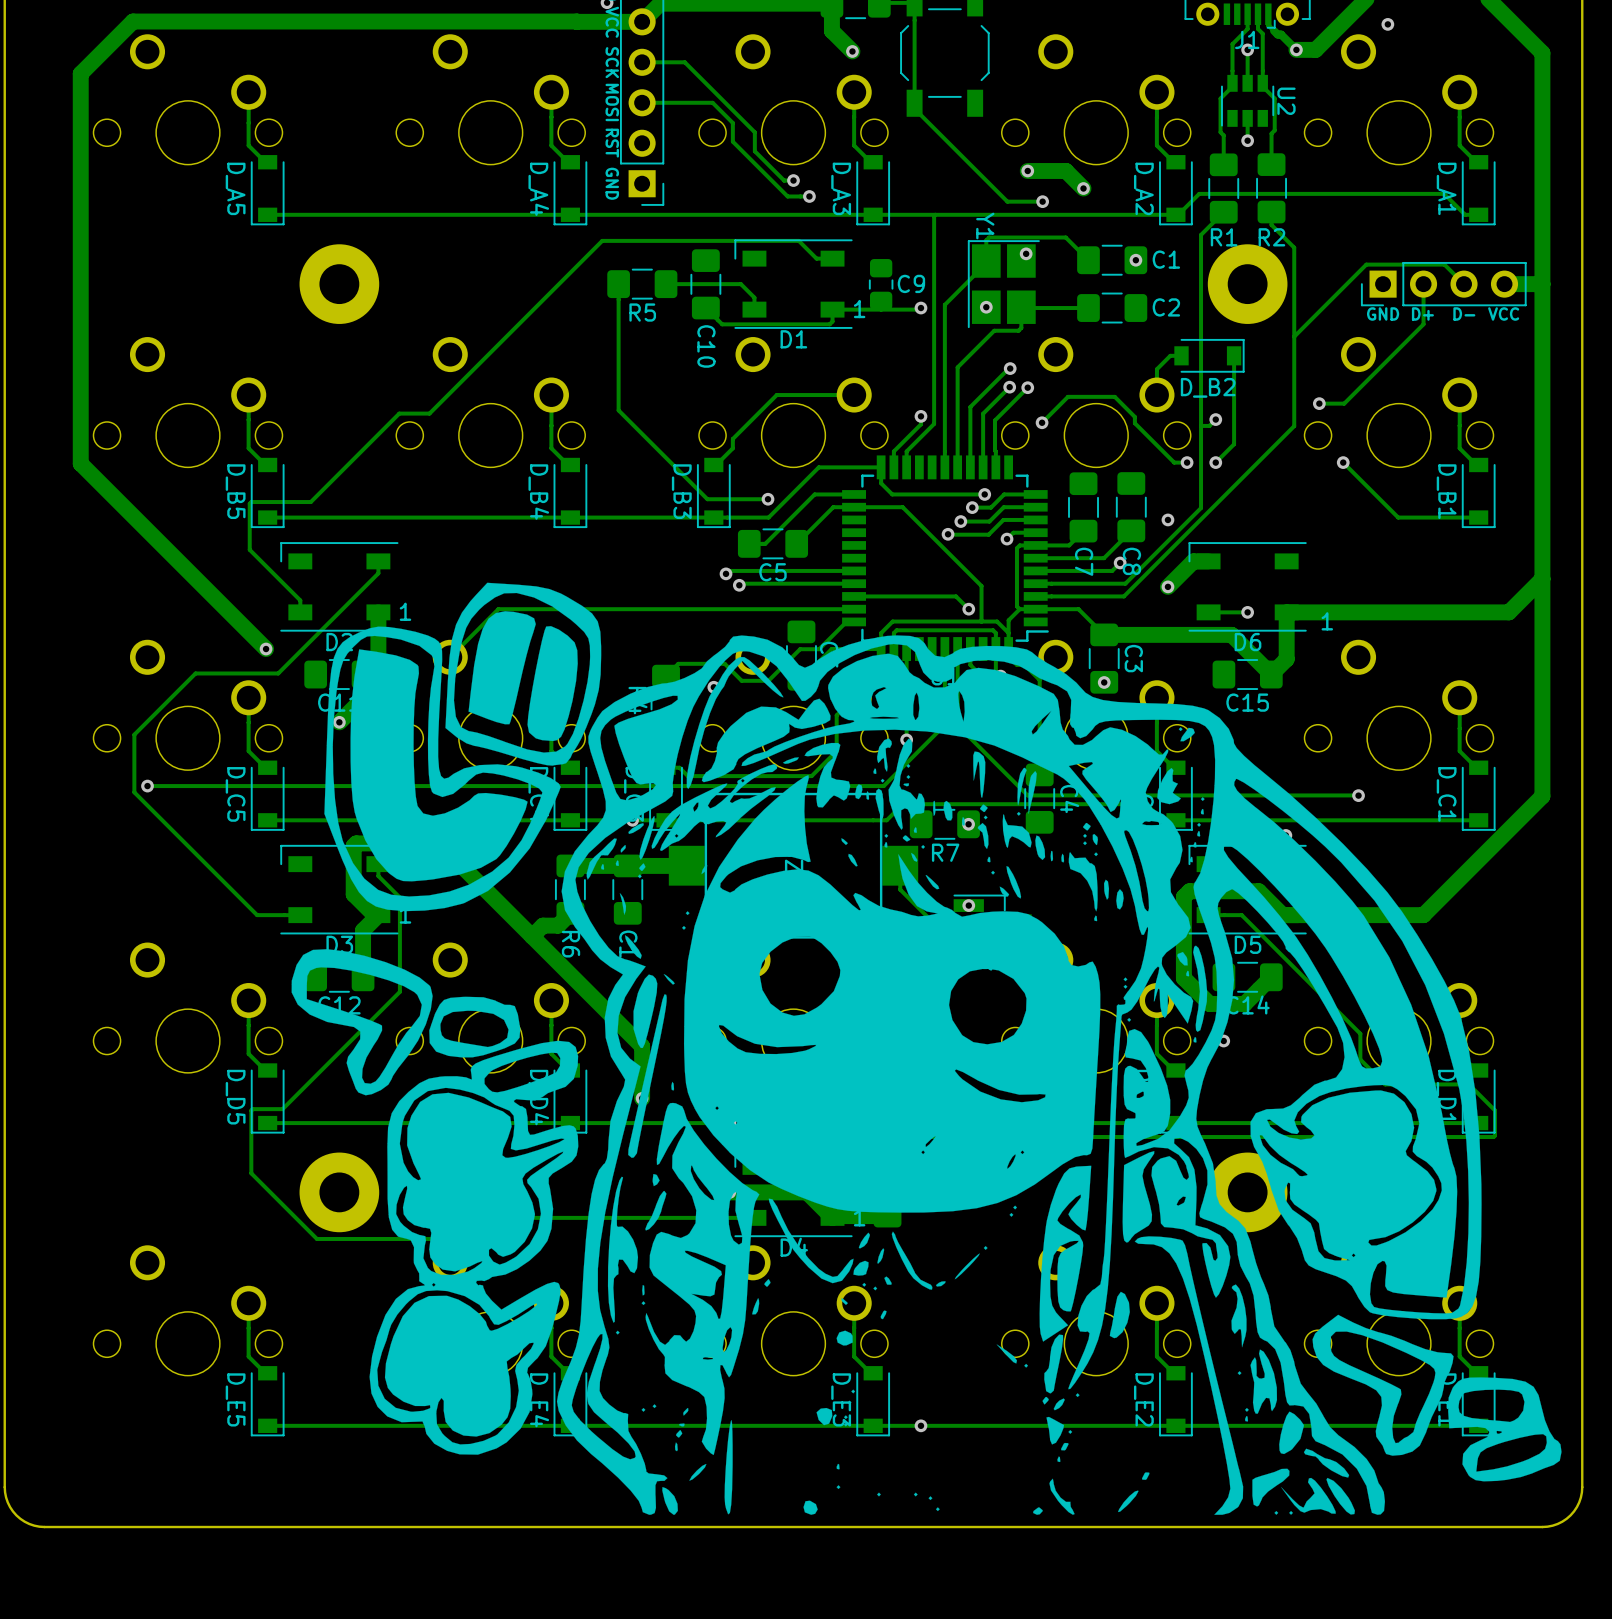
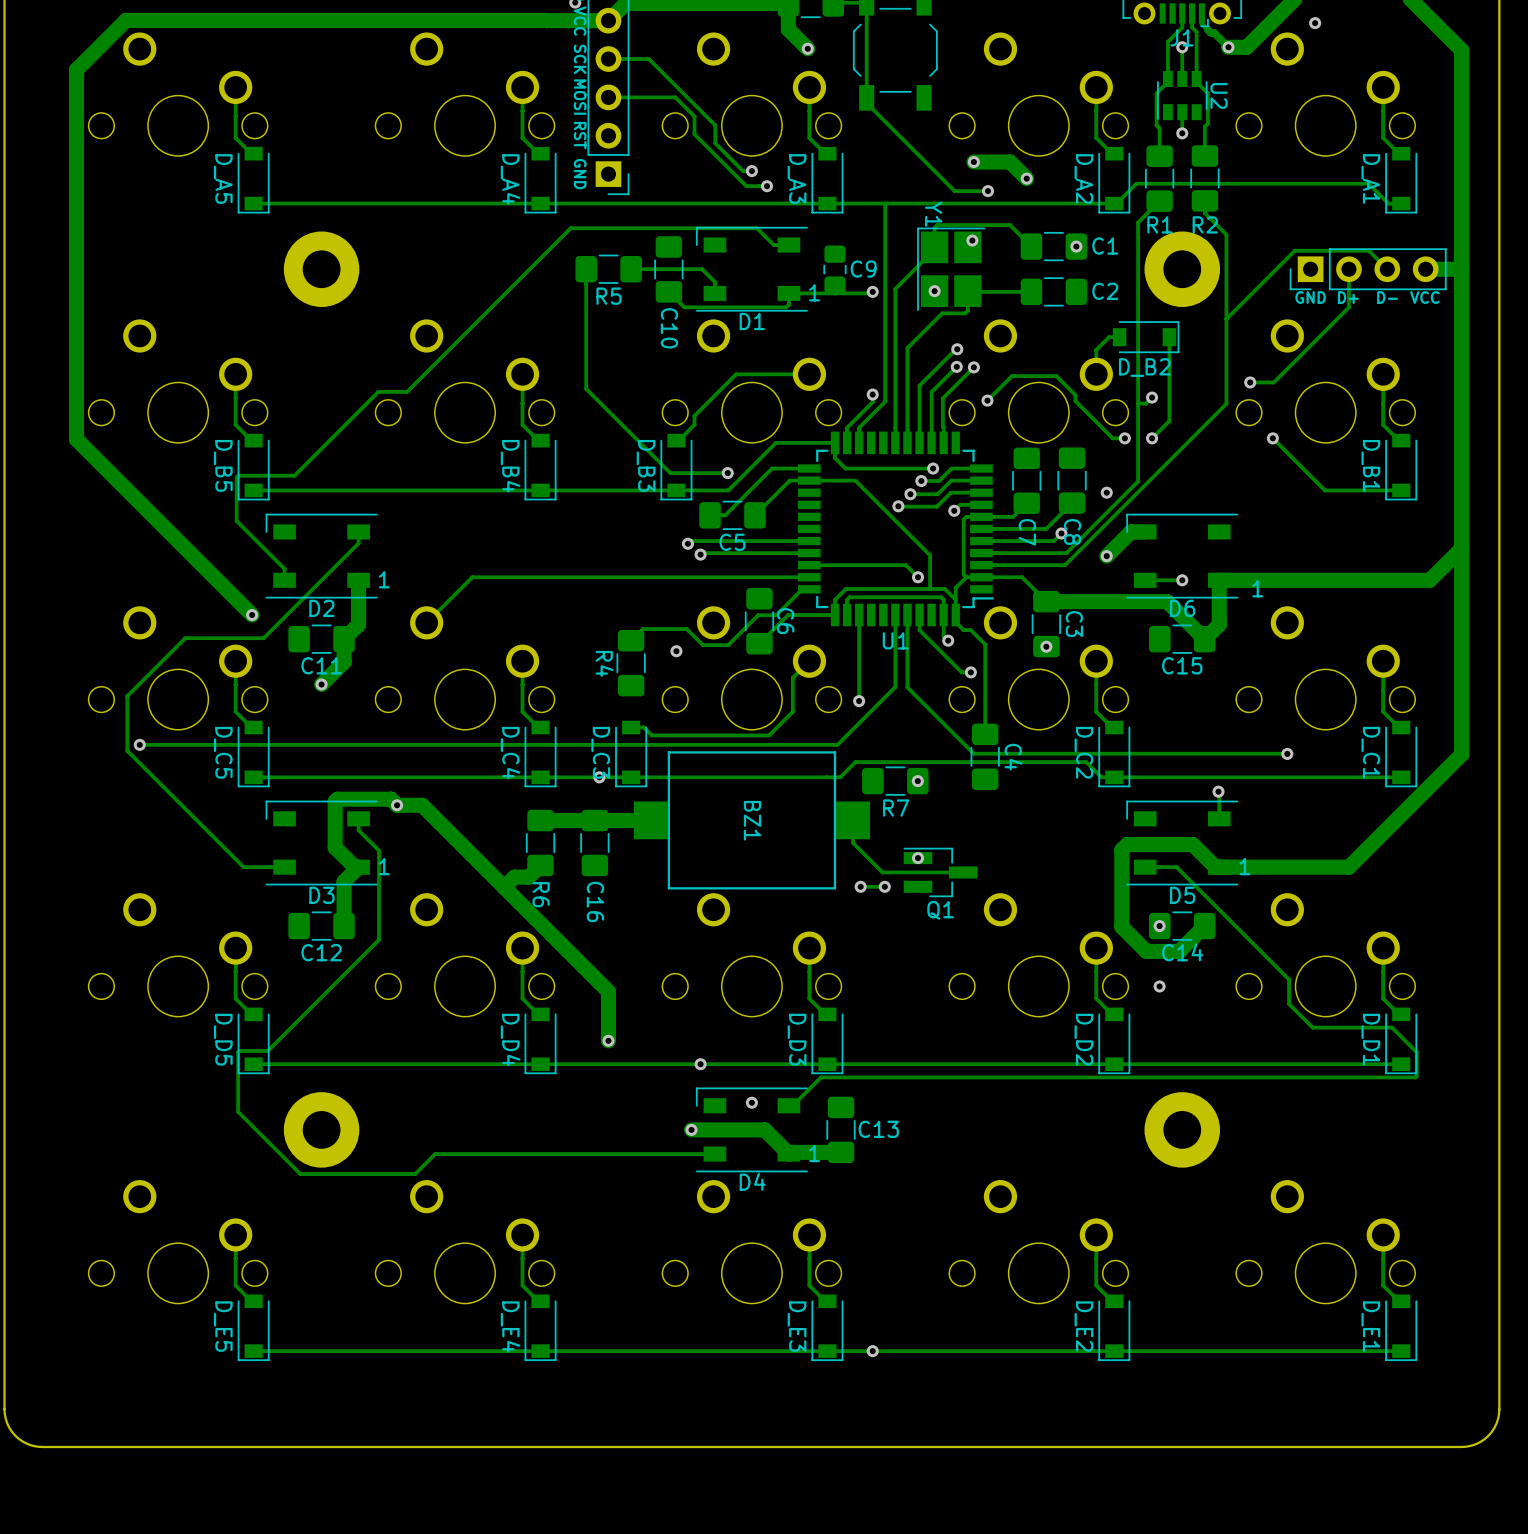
drawing: [291, 582, 1562, 1515] -> none

